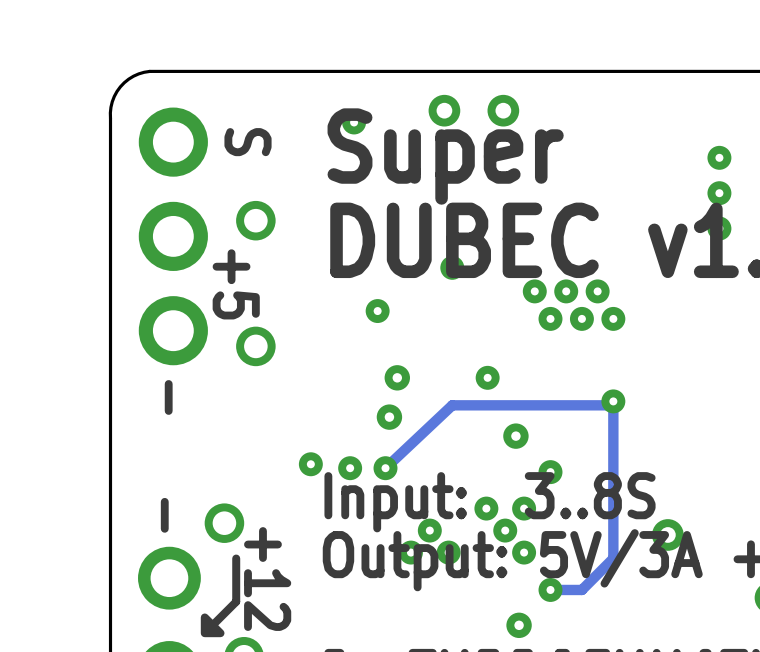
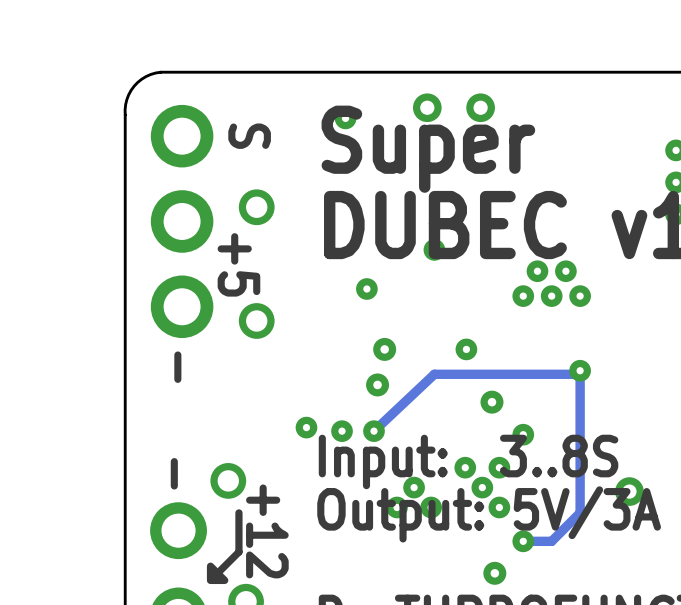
via: (534, 291) -> none

